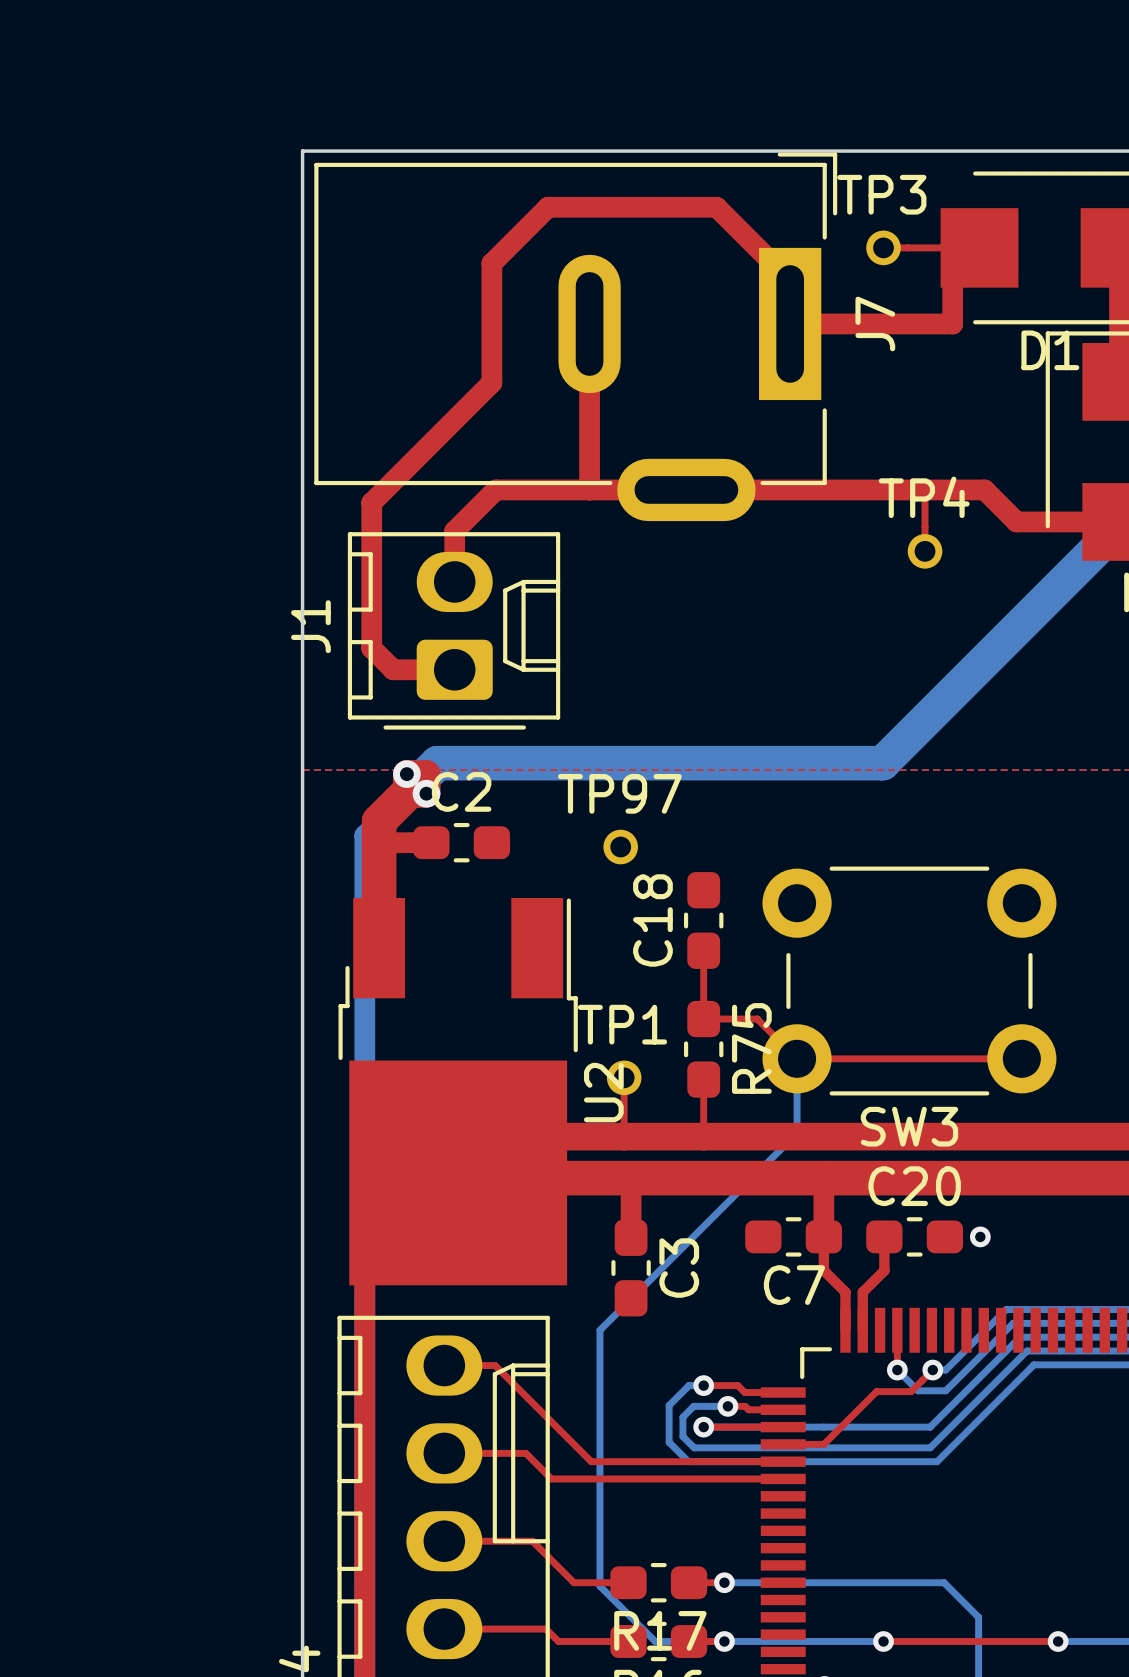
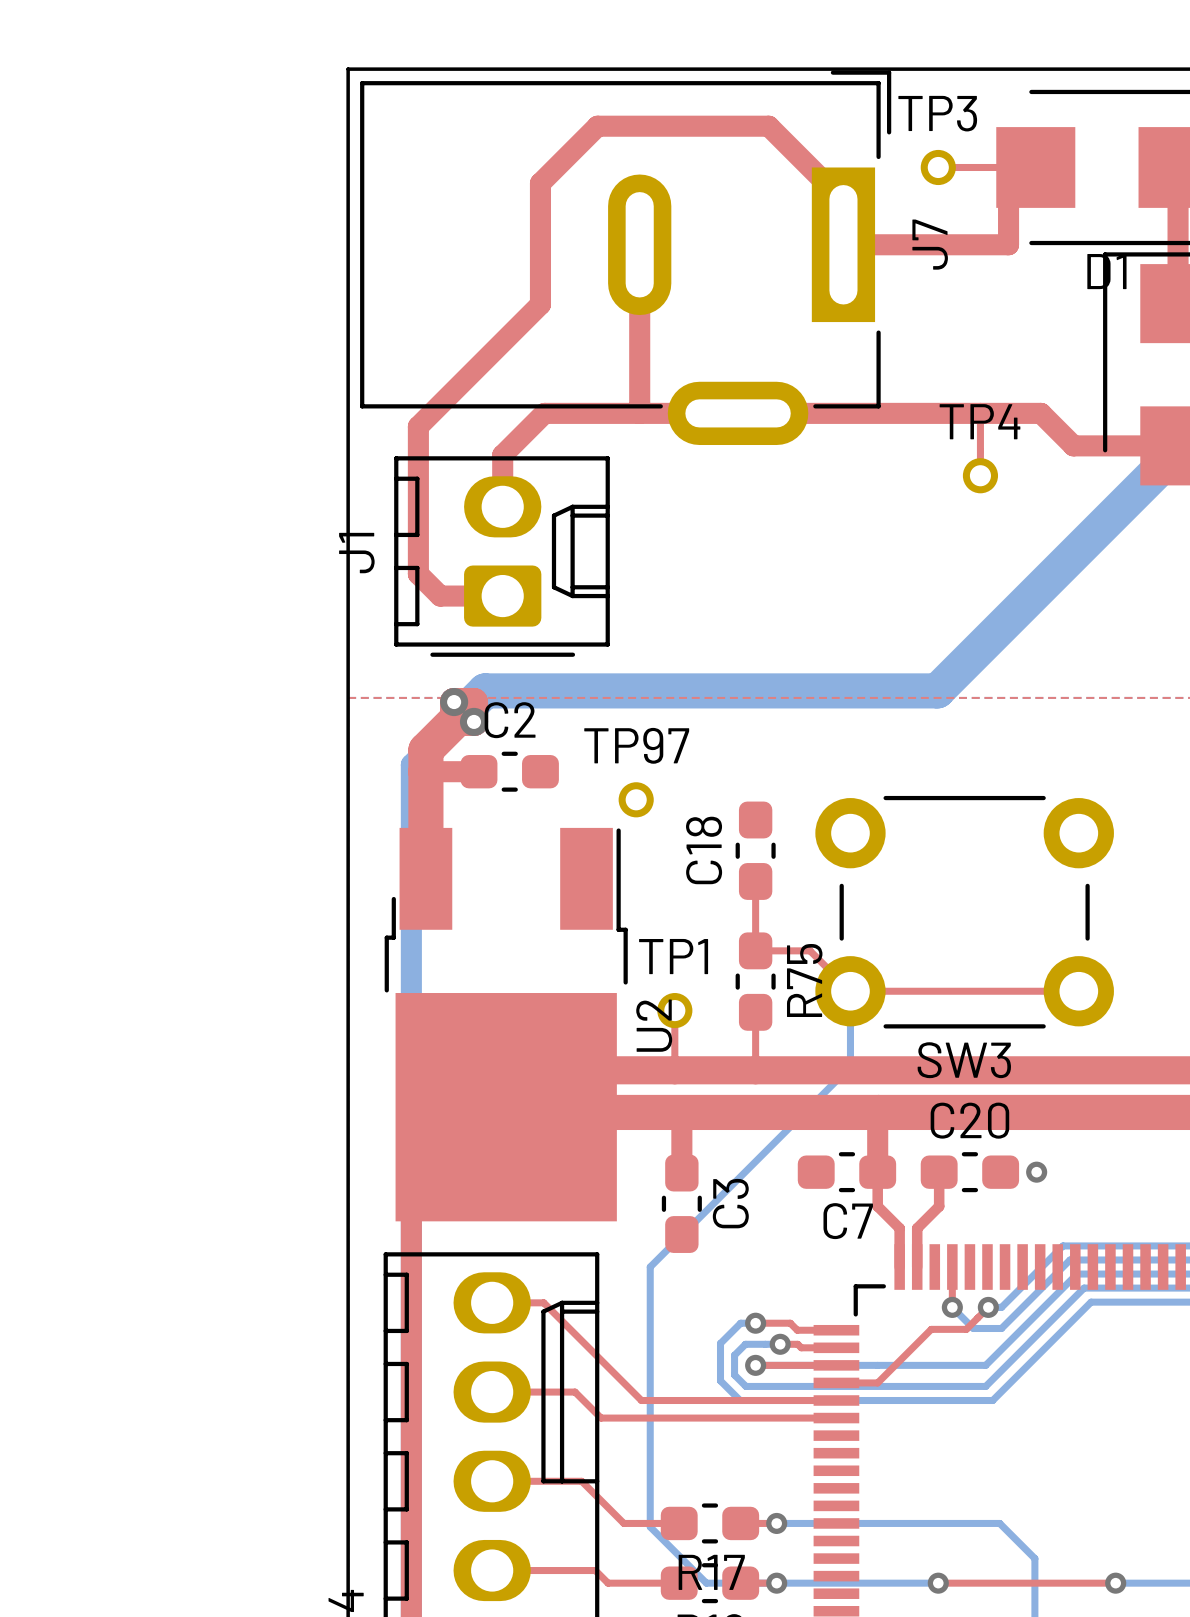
TP97 position: (620, 847) -> (636, 799)

